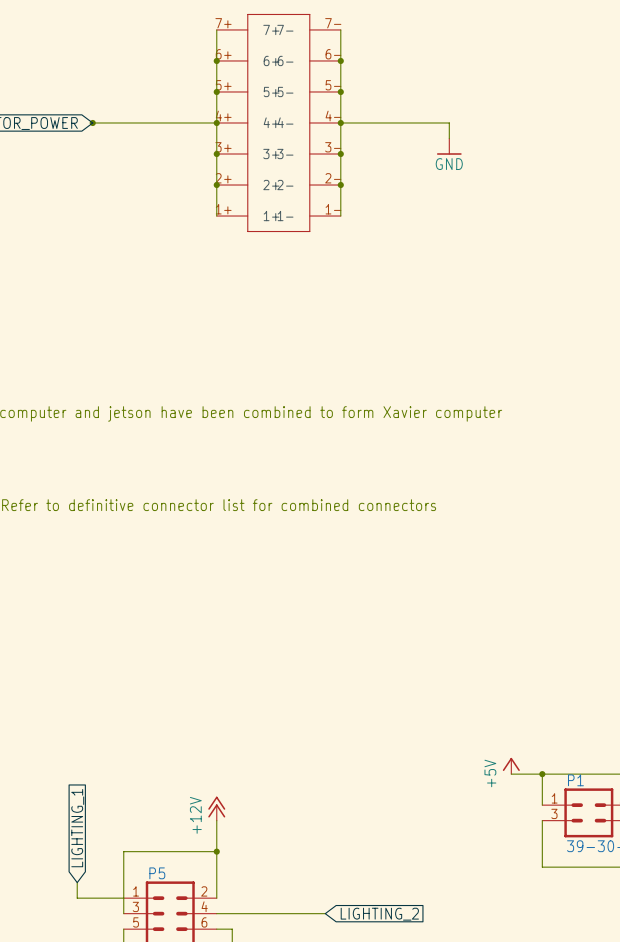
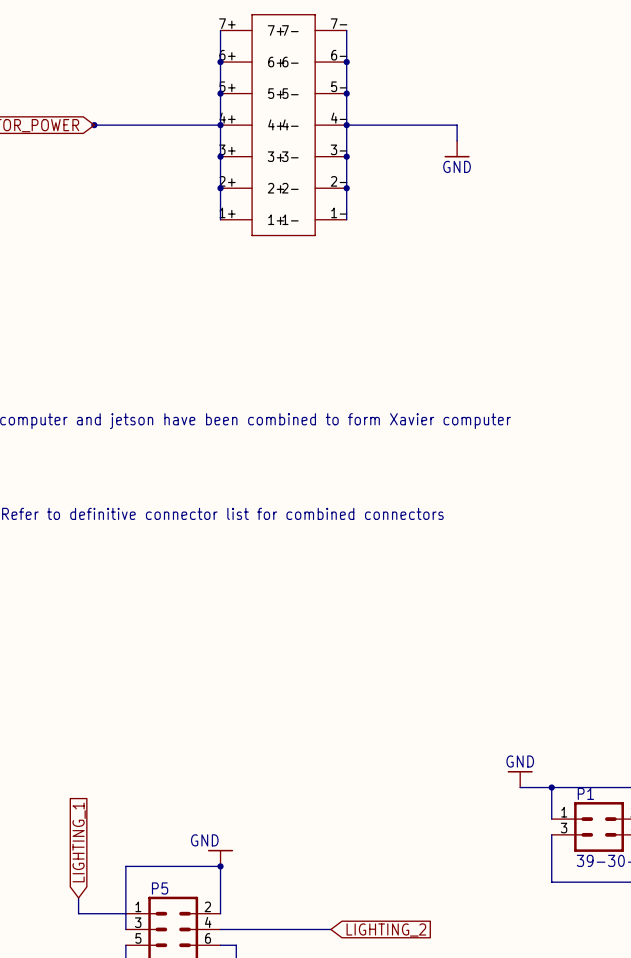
power symbol: +5V (511, 765) -> GND (520, 779)
power symbol: +12V (216, 808) -> none
power symbol: none -> GND (220, 858)

